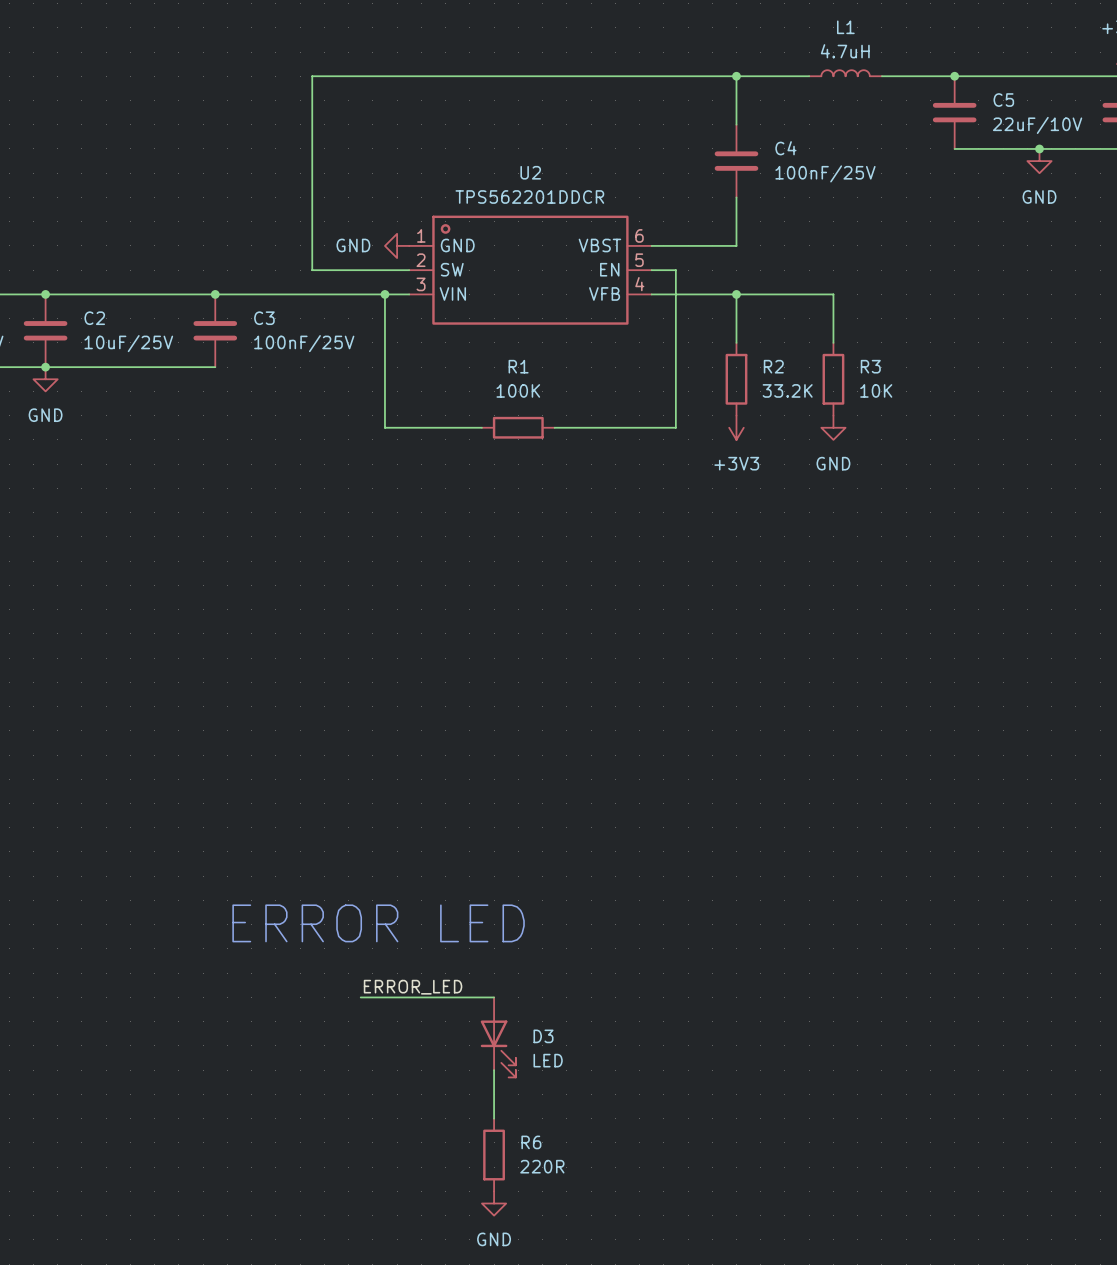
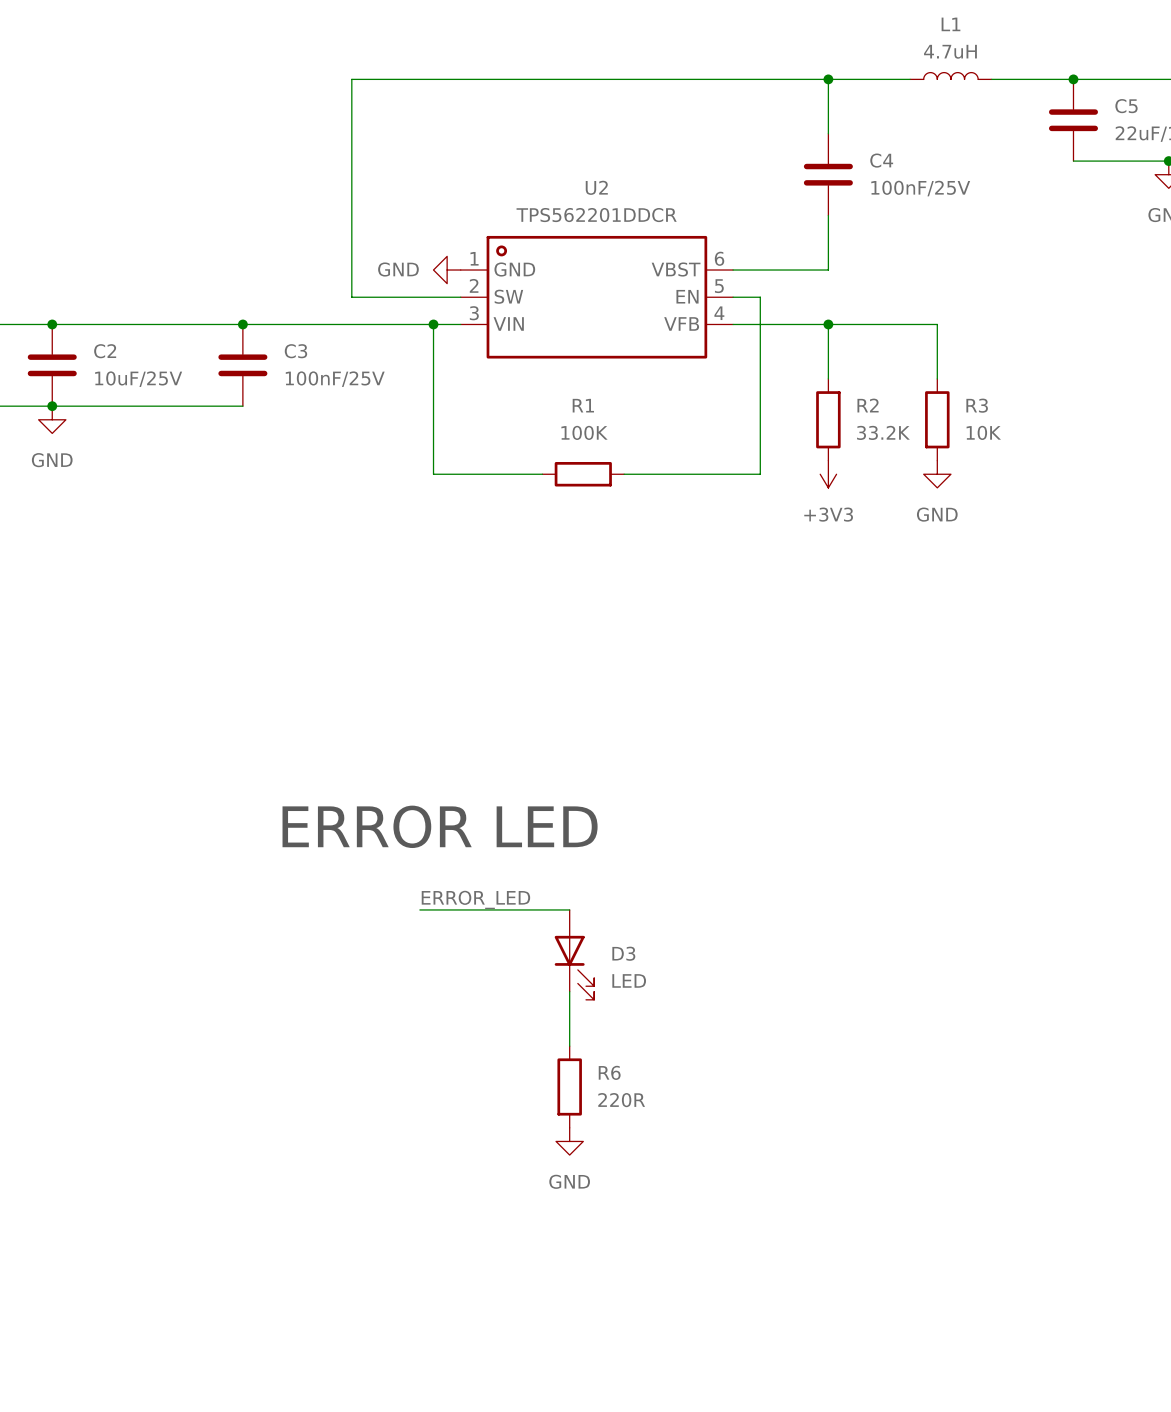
text position: ERROR LED (378, 923) -> ERROR LED (440, 826)
label position: ERROR_LED (413, 987) -> ERROR_LED (475, 899)
wire: (360, 997) (494, 997) -> (419, 909) (569, 909)
D3 position: (498, 1037) -> (574, 954)
wire: (494, 1070) (494, 1118) -> (569, 991) (569, 1046)
R6 position: (494, 1155) -> (569, 1086)
power symbol position: GND (494, 1203) -> GND (569, 1141)

